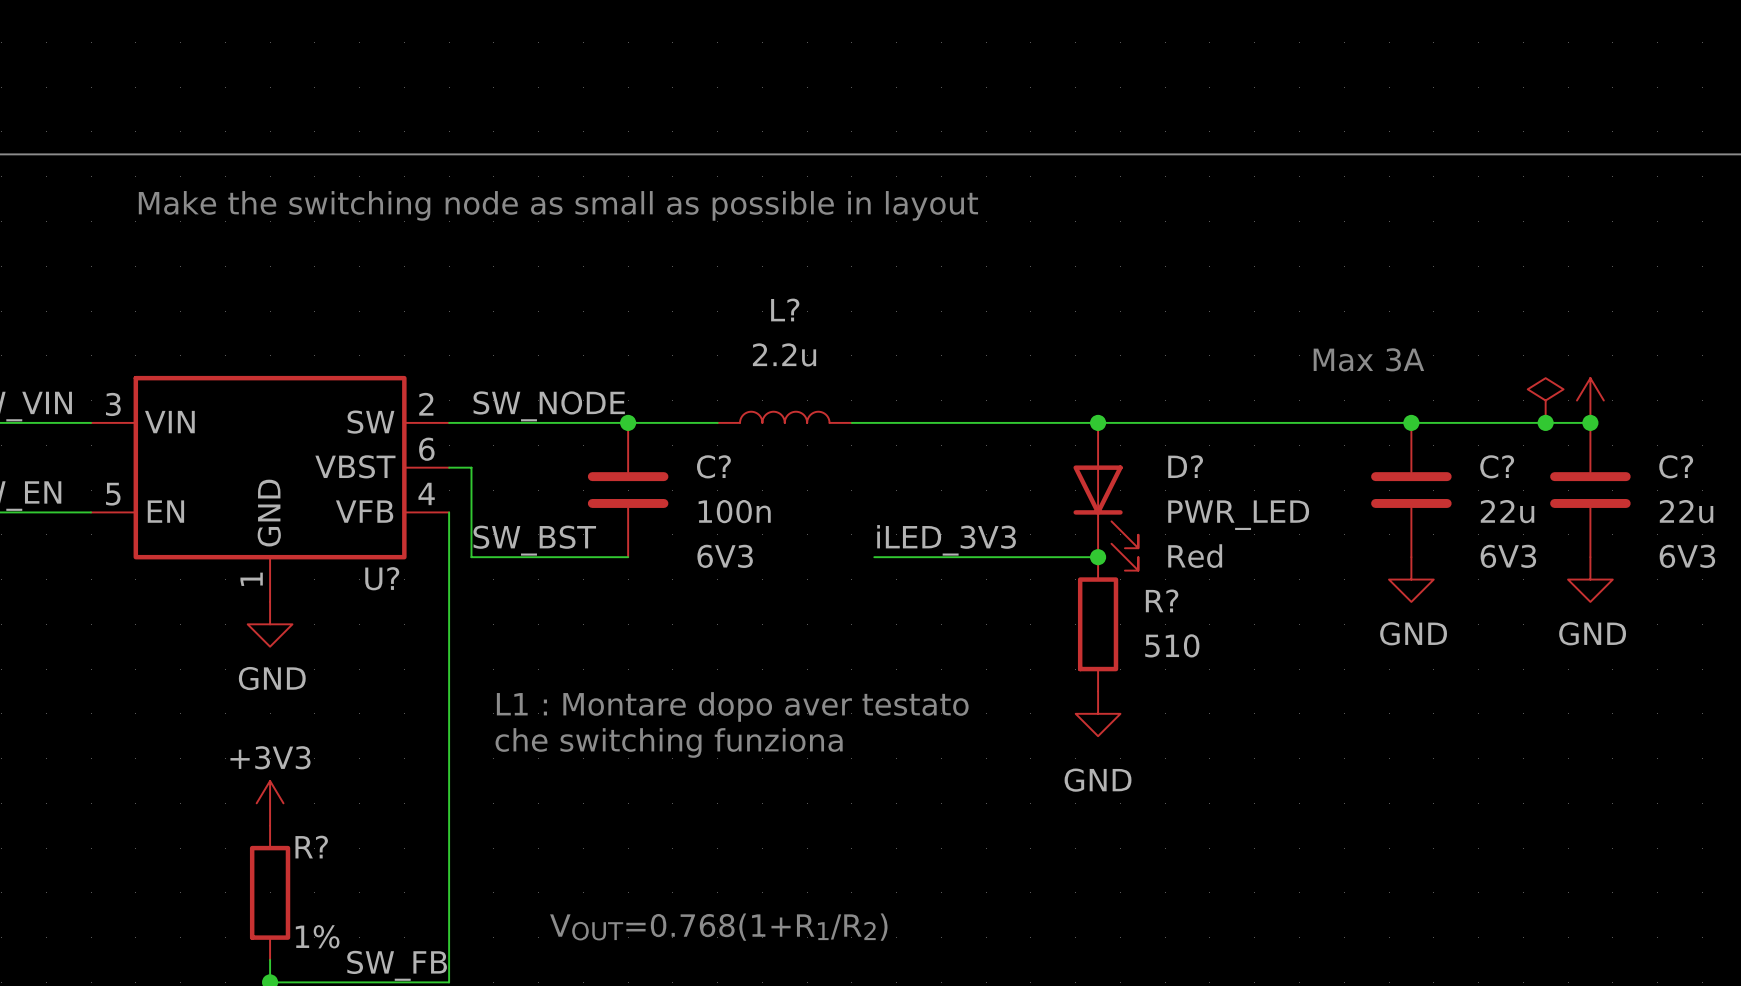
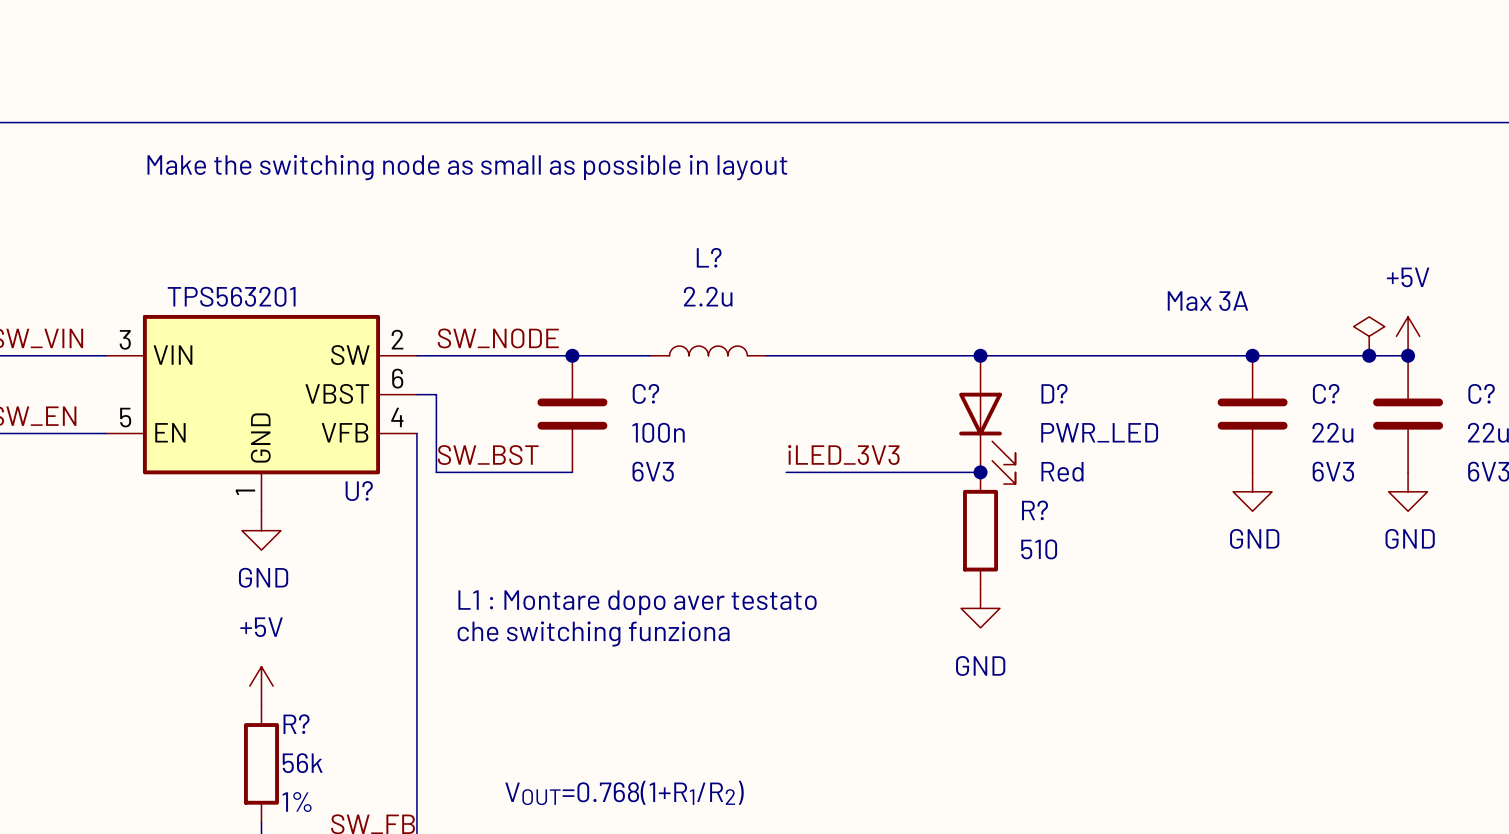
power symbol text: none -> +5V (1408, 277)
U? value: none -> TPS563201 (231, 296)
power symbol: +3V3 (270, 803) -> +5V (261, 686)
R? value: none -> 56k (302, 763)

